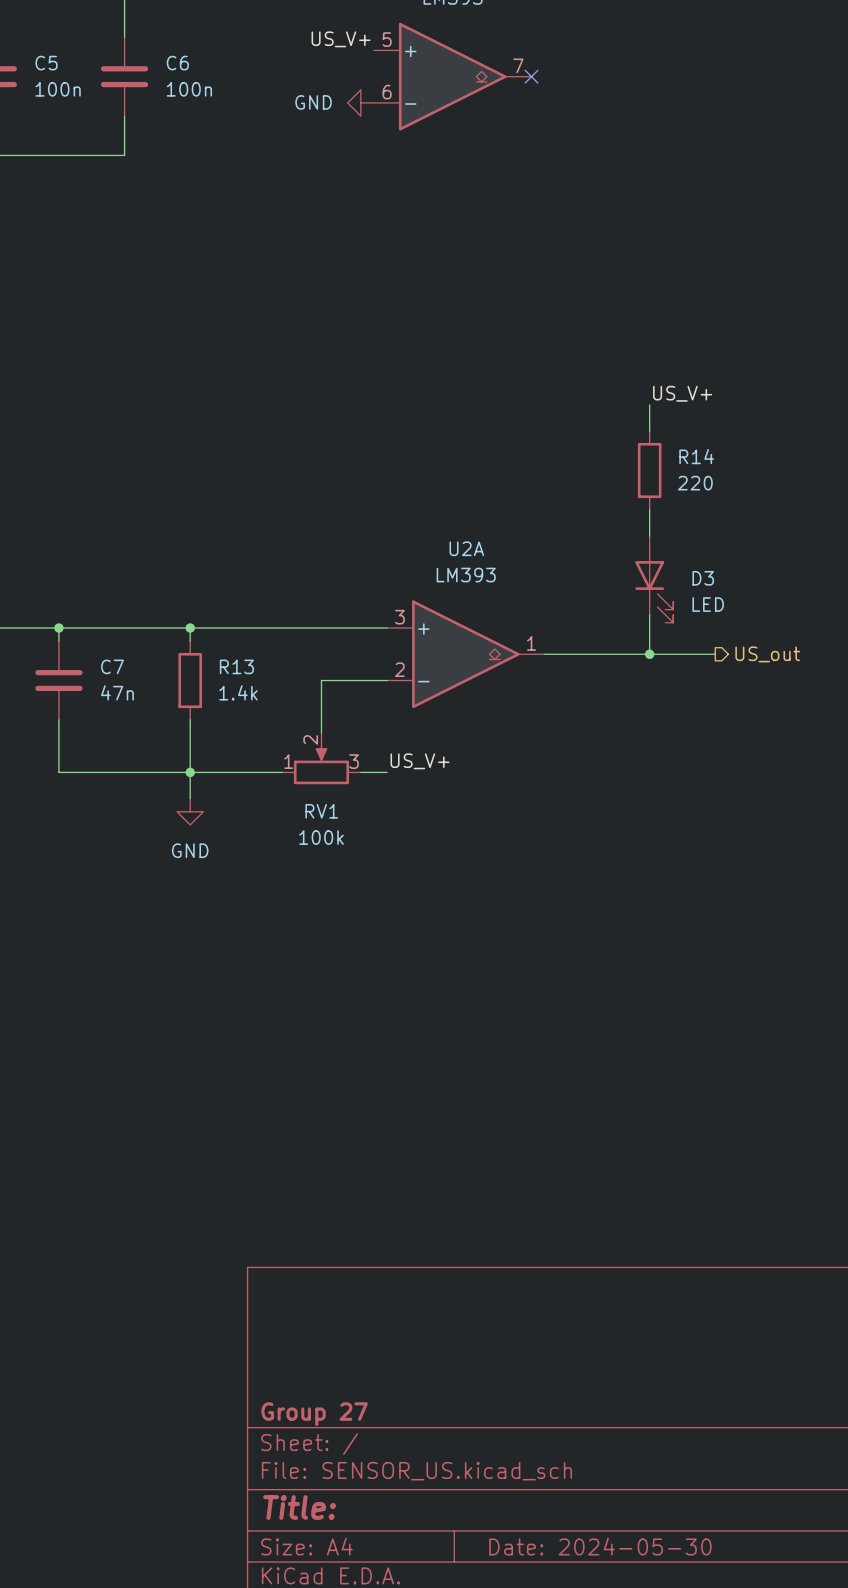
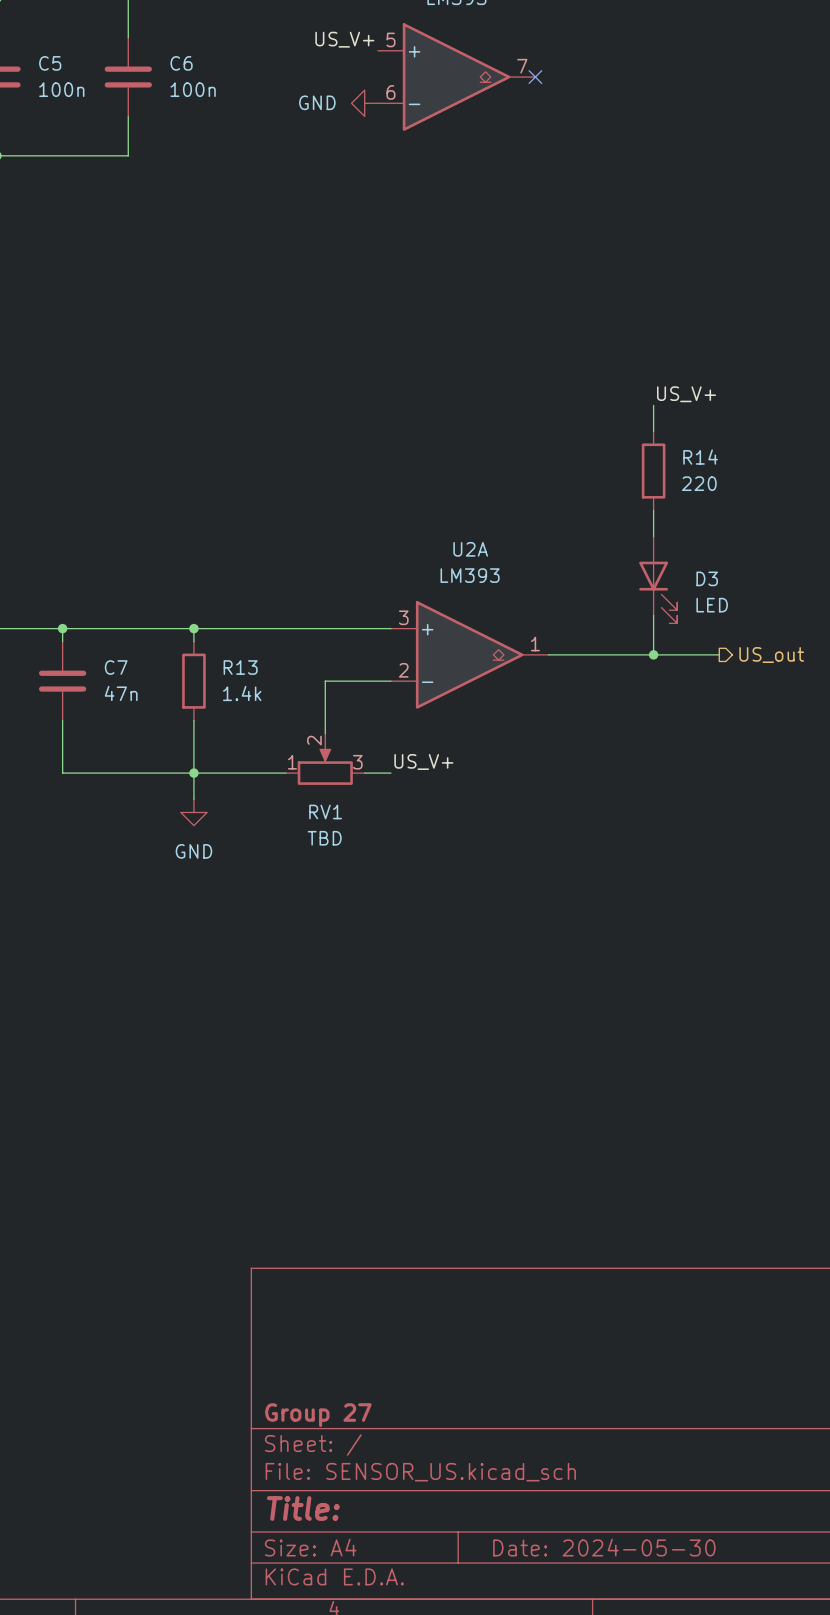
RV1 value: 100k (321, 837) -> TBD (324, 838)

